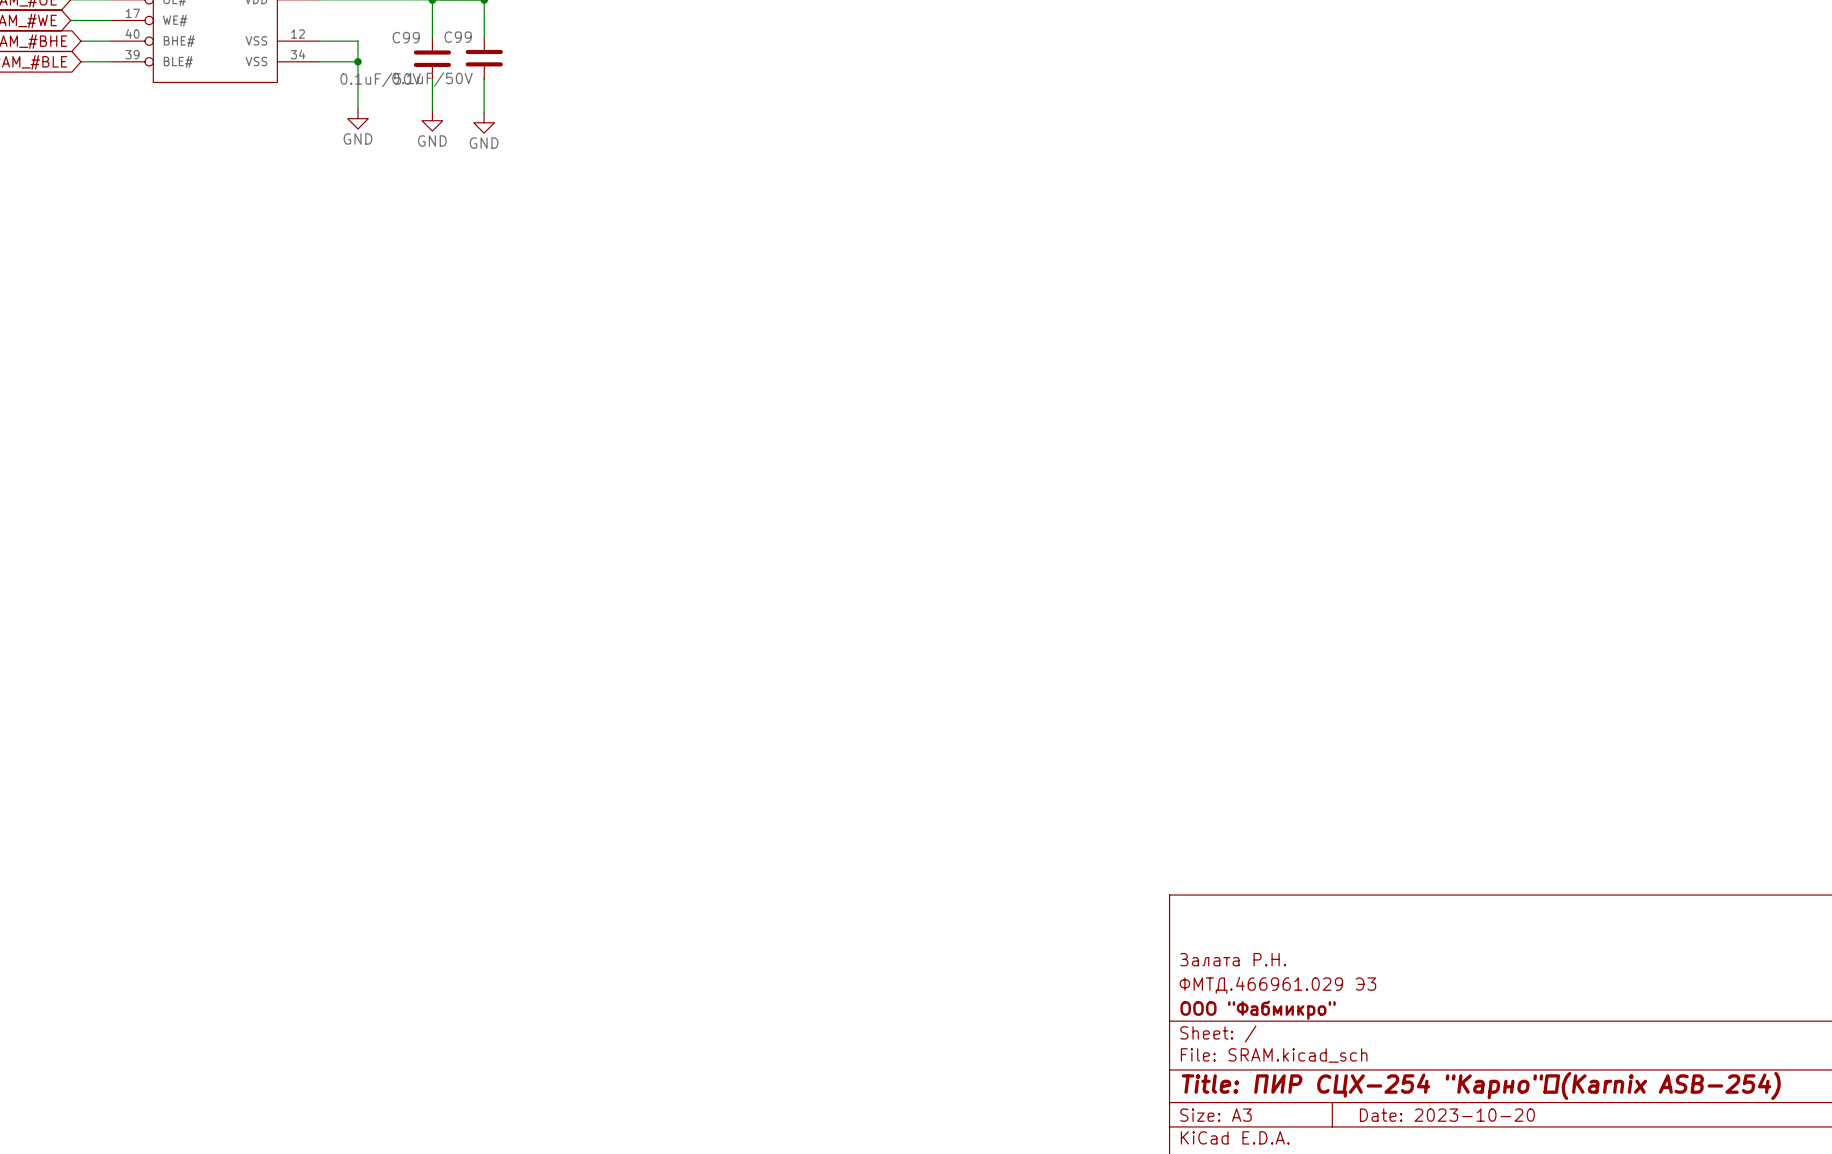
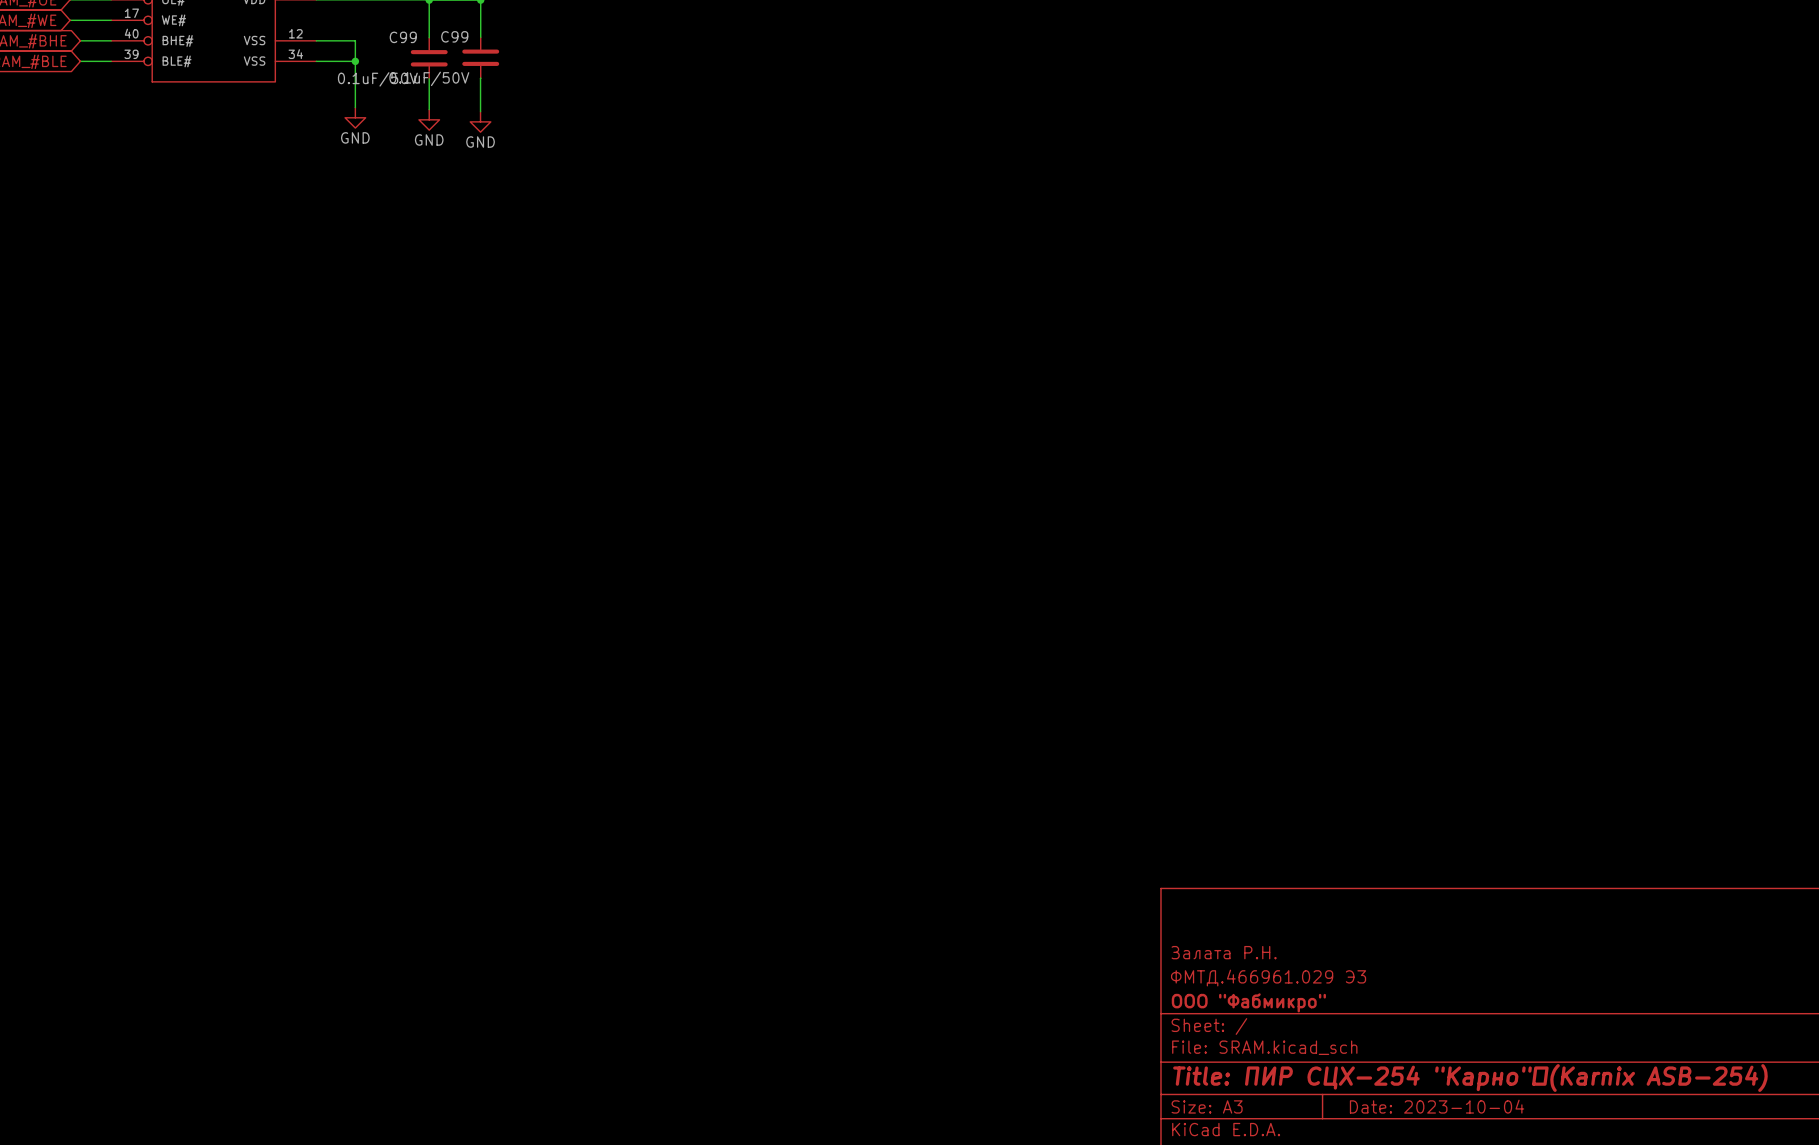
title block: Date: 2023-10-20 (1447, 1115) -> Date: 2023-10-04 (1437, 1106)

